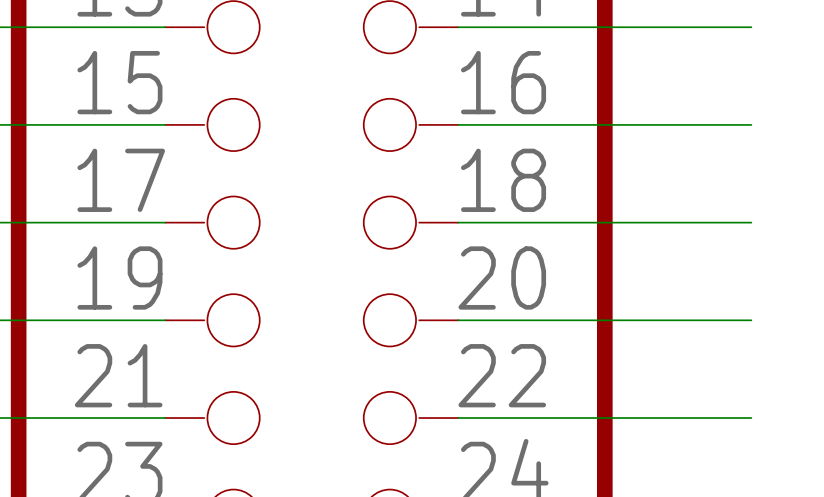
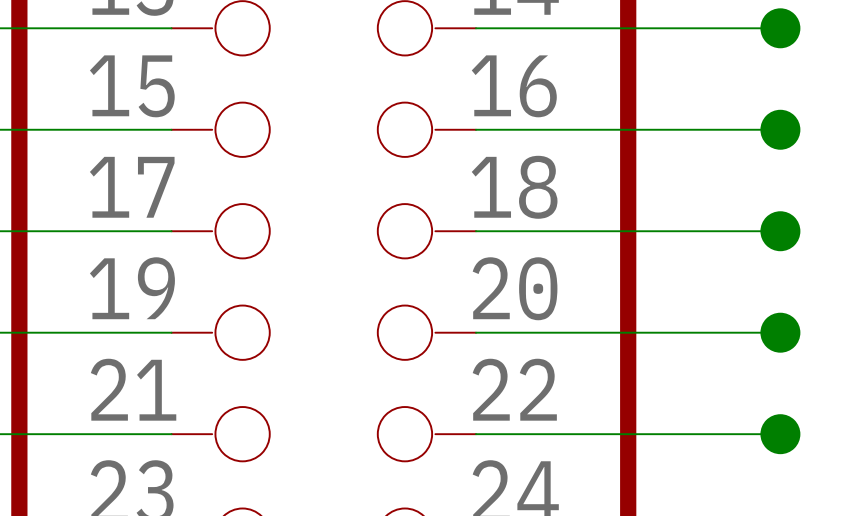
junction: none -> (780, 28)
junction: none -> (780, 129)
junction: none -> (780, 231)
junction: none -> (780, 332)
junction: none -> (780, 434)

